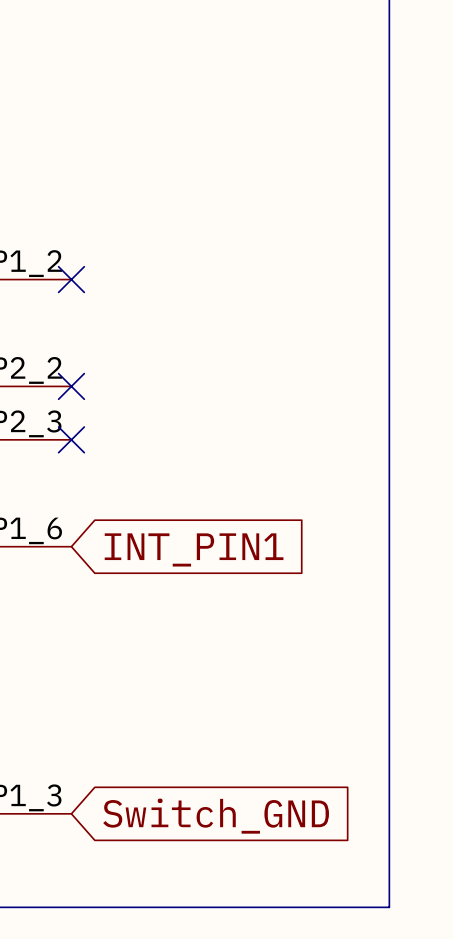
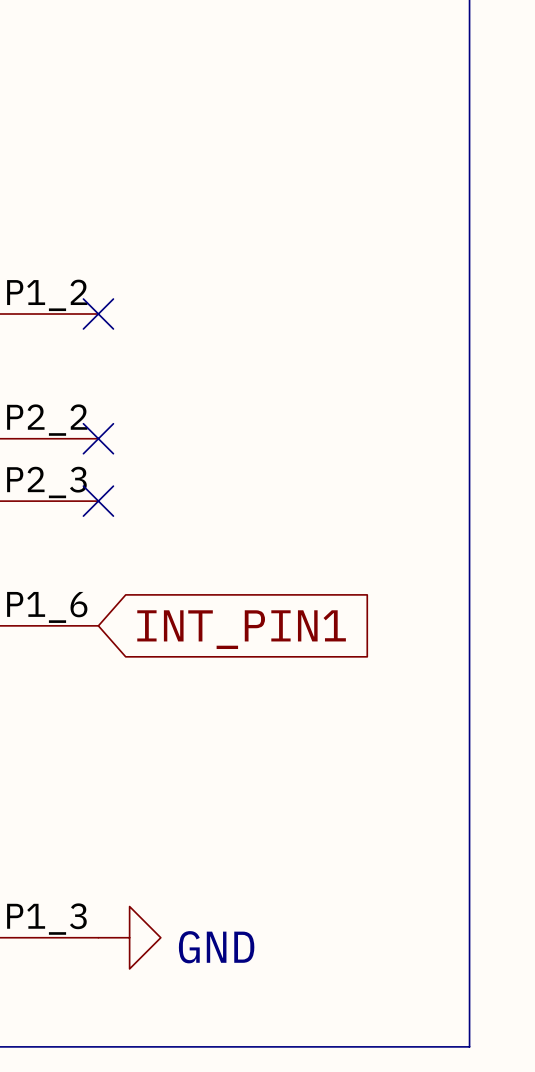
power symbol: none -> GND (129, 937)
global label: Switch_GND (216, 816) -> none

